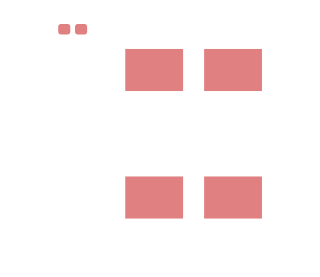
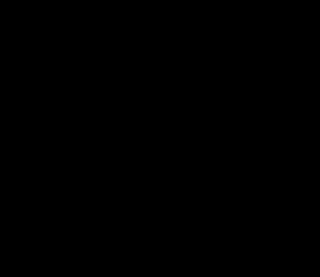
part: (72, 29) -> none
part: (193, 69) -> none
part: (193, 197) -> none

